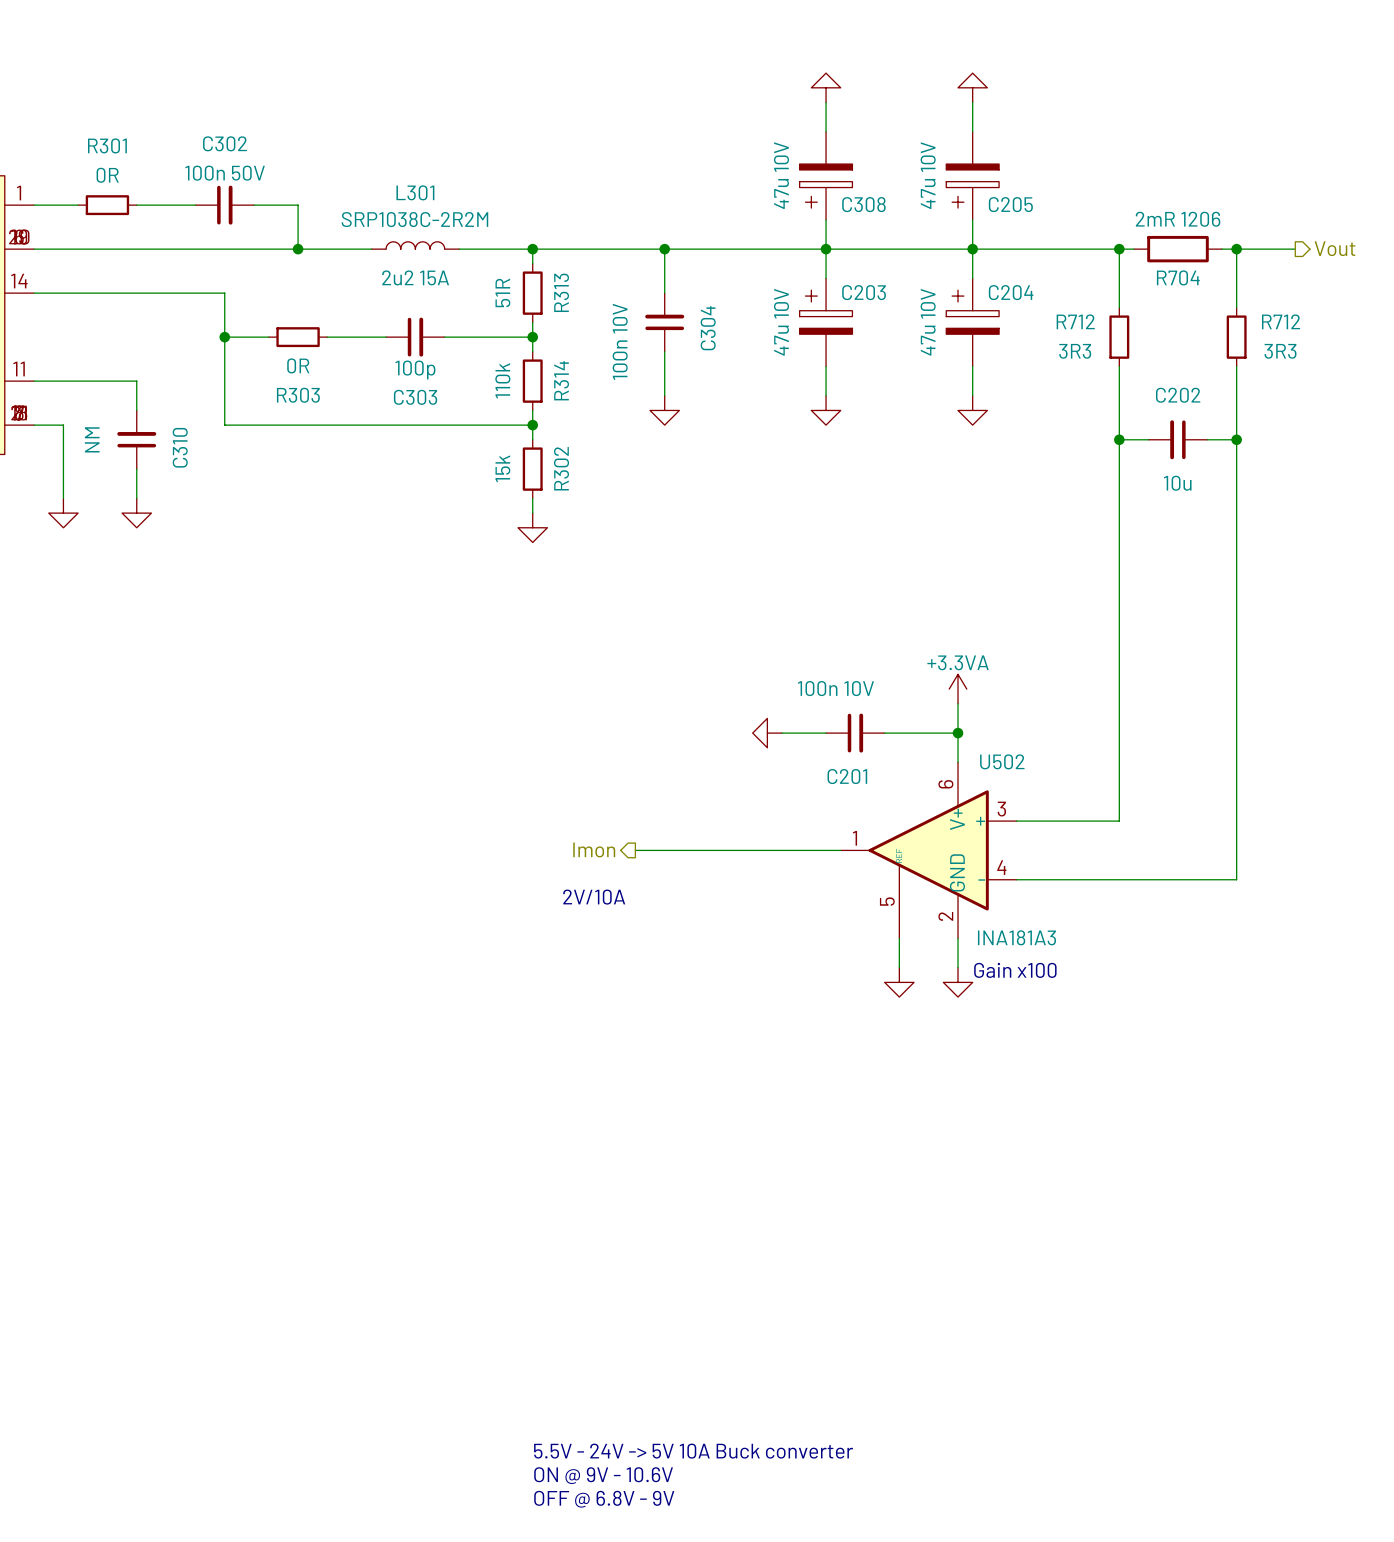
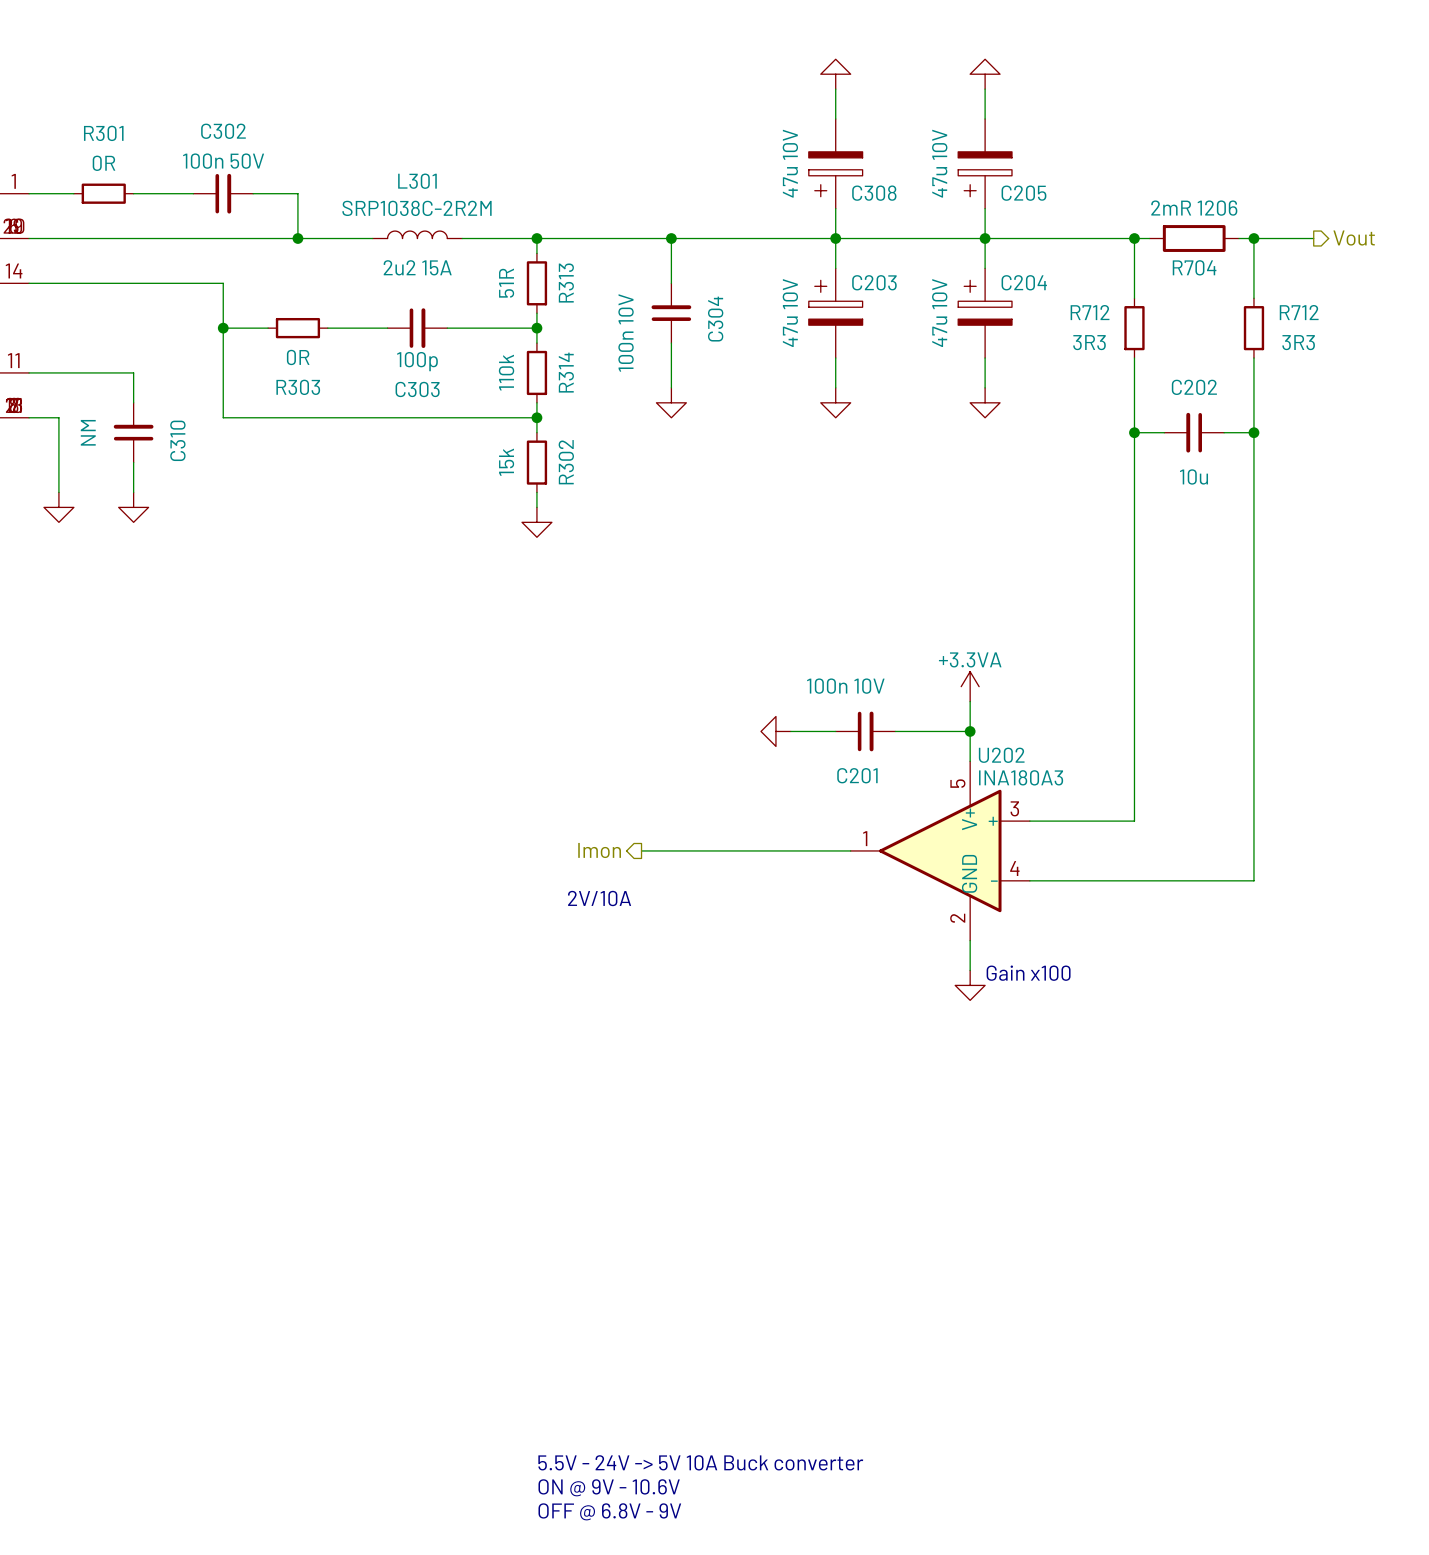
U502: INA181A3 (928, 850) -> none
U202: none -> INA180A3 (940, 850)
wire: (899, 938) (899, 967) -> none
power symbol: (899, 982) -> none

